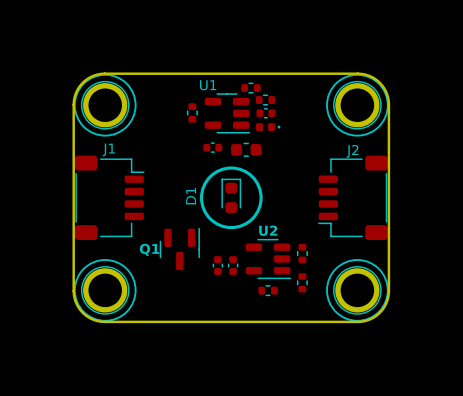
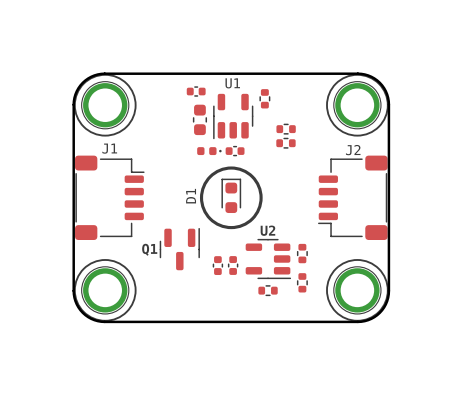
part: (250, 88) -> none
part: none -> (196, 91)
part rotation: 0° (265, 100) -> 90° clockwise (264, 98)
part footprint: [186, 103, 198, 123] -> [192, 104, 208, 136]
U1 rotation: 0° (227, 113) -> 90° clockwise (233, 116)
part: (265, 113) -> none
part: (268, 127) -> none
part: none -> (286, 129)
part footprint: [203, 142, 223, 153] -> [197, 147, 222, 156]
part: none -> (285, 143)
part: (246, 149) -> none
part: none -> (235, 151)

